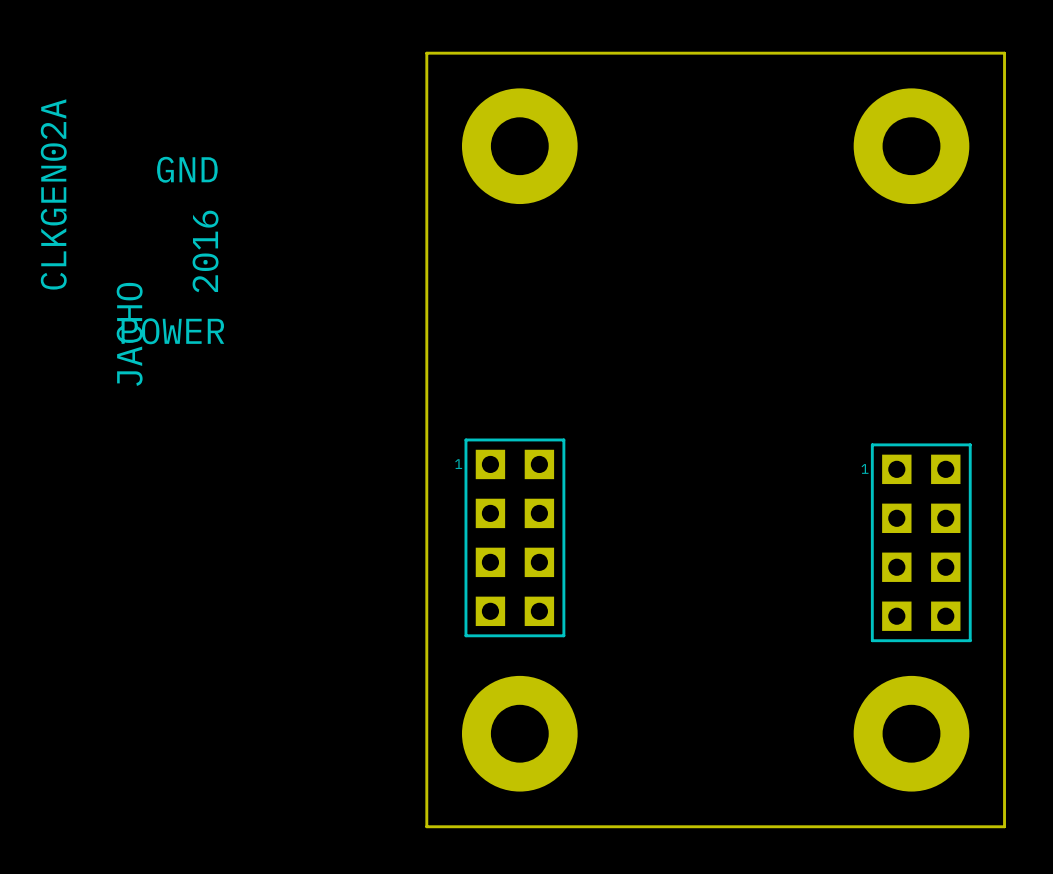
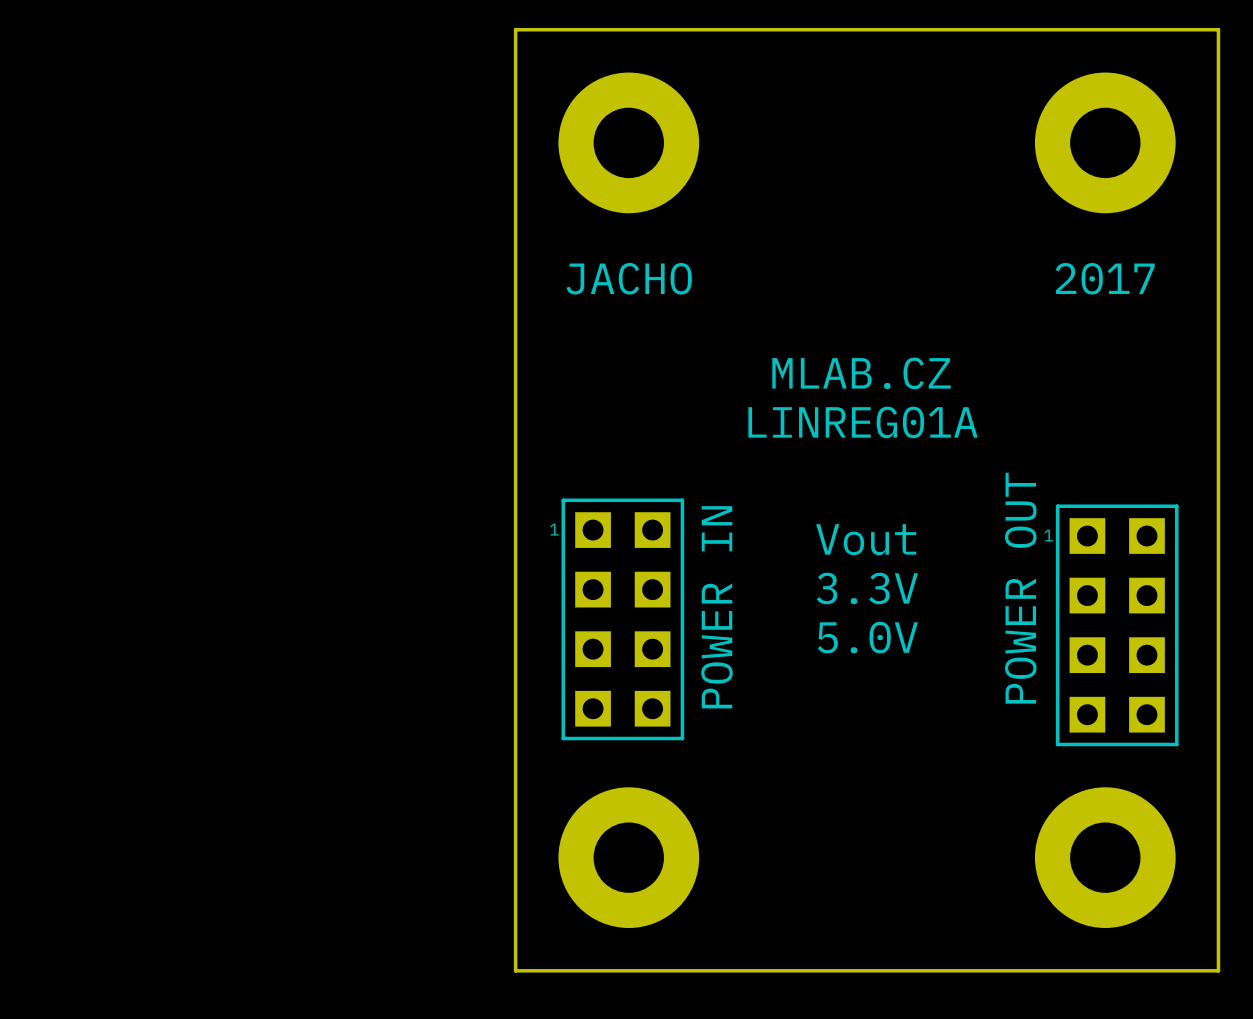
text: GND (187, 169) -> none
text: CLKGEN02A (53, 194) -> none
text: 2016 (205, 251) -> none
text: none -> 2017 (1105, 278)
text: POWER (172, 331) -> none
text rotation: 0° (129, 334) -> 90° clockwise (629, 278)
text position: JACHO (129, 334) -> JACHO (629, 278)
text: none -> MLAB.CZ (861, 373)
text: none -> LINREG01A (863, 422)
text: none -> Vout (866, 539)
text: none -> 3.3V (867, 588)
text: none -> POWER OUT (1020, 588)
text: none -> POWER IN (717, 607)
text: none -> 5.0V (867, 637)

